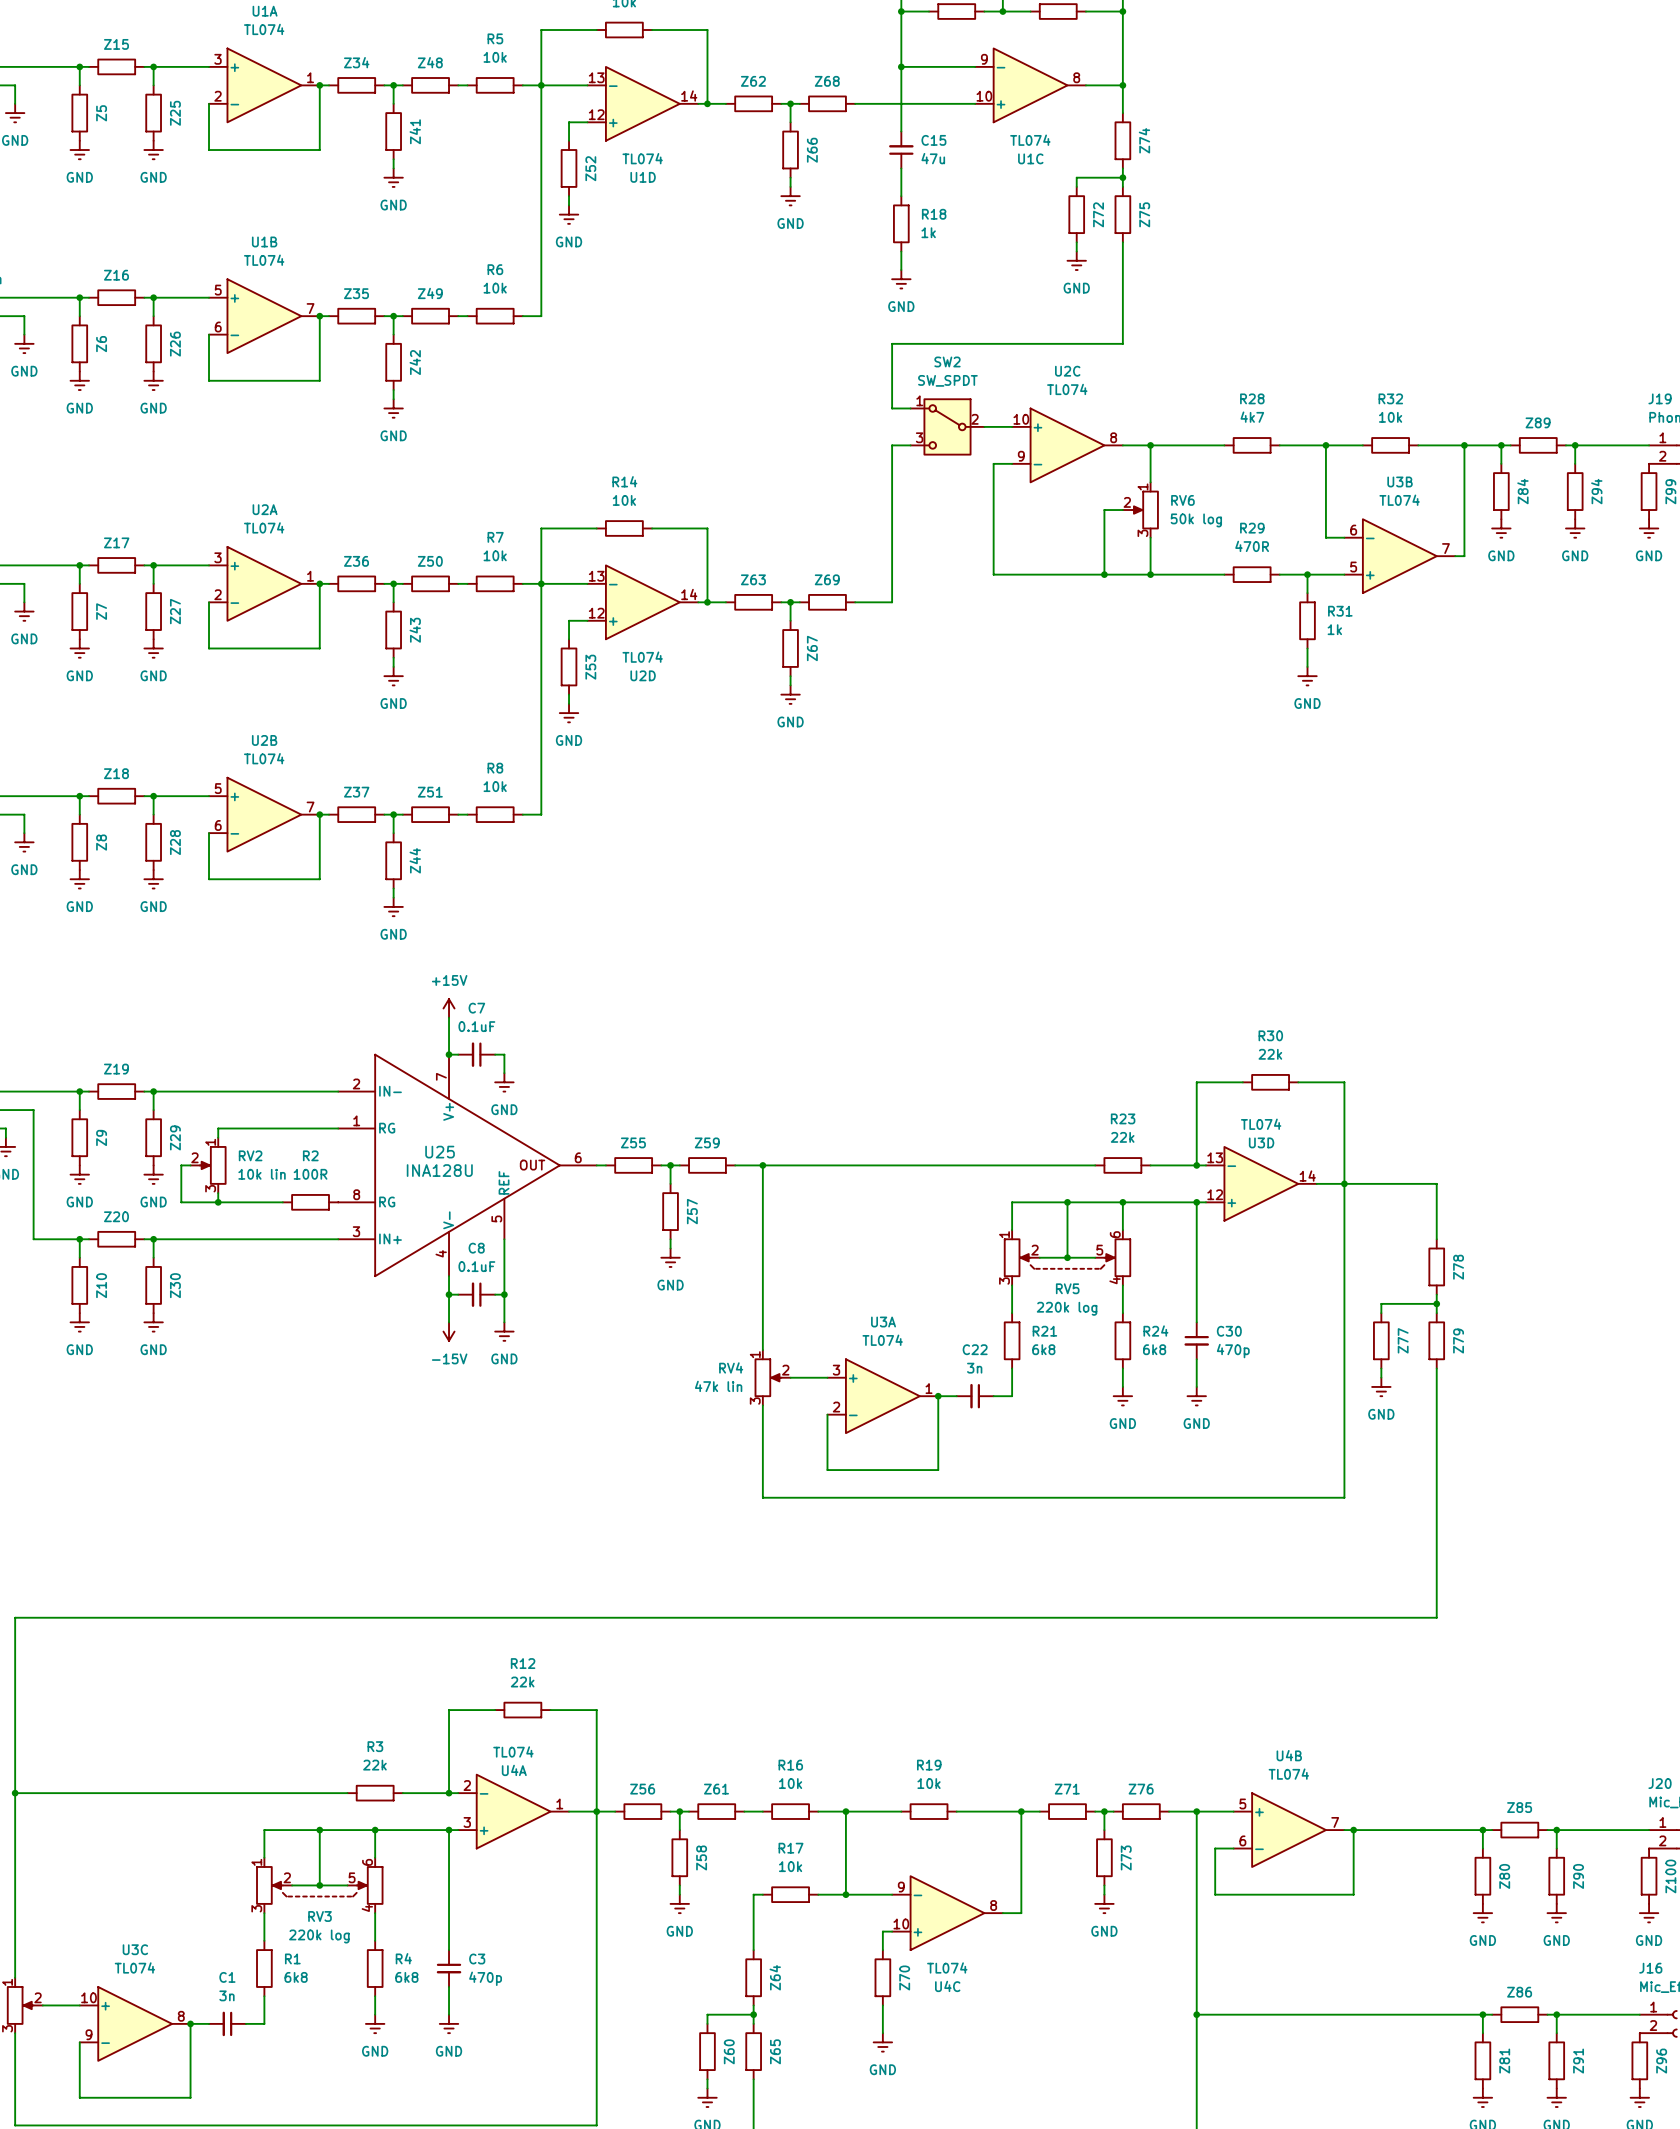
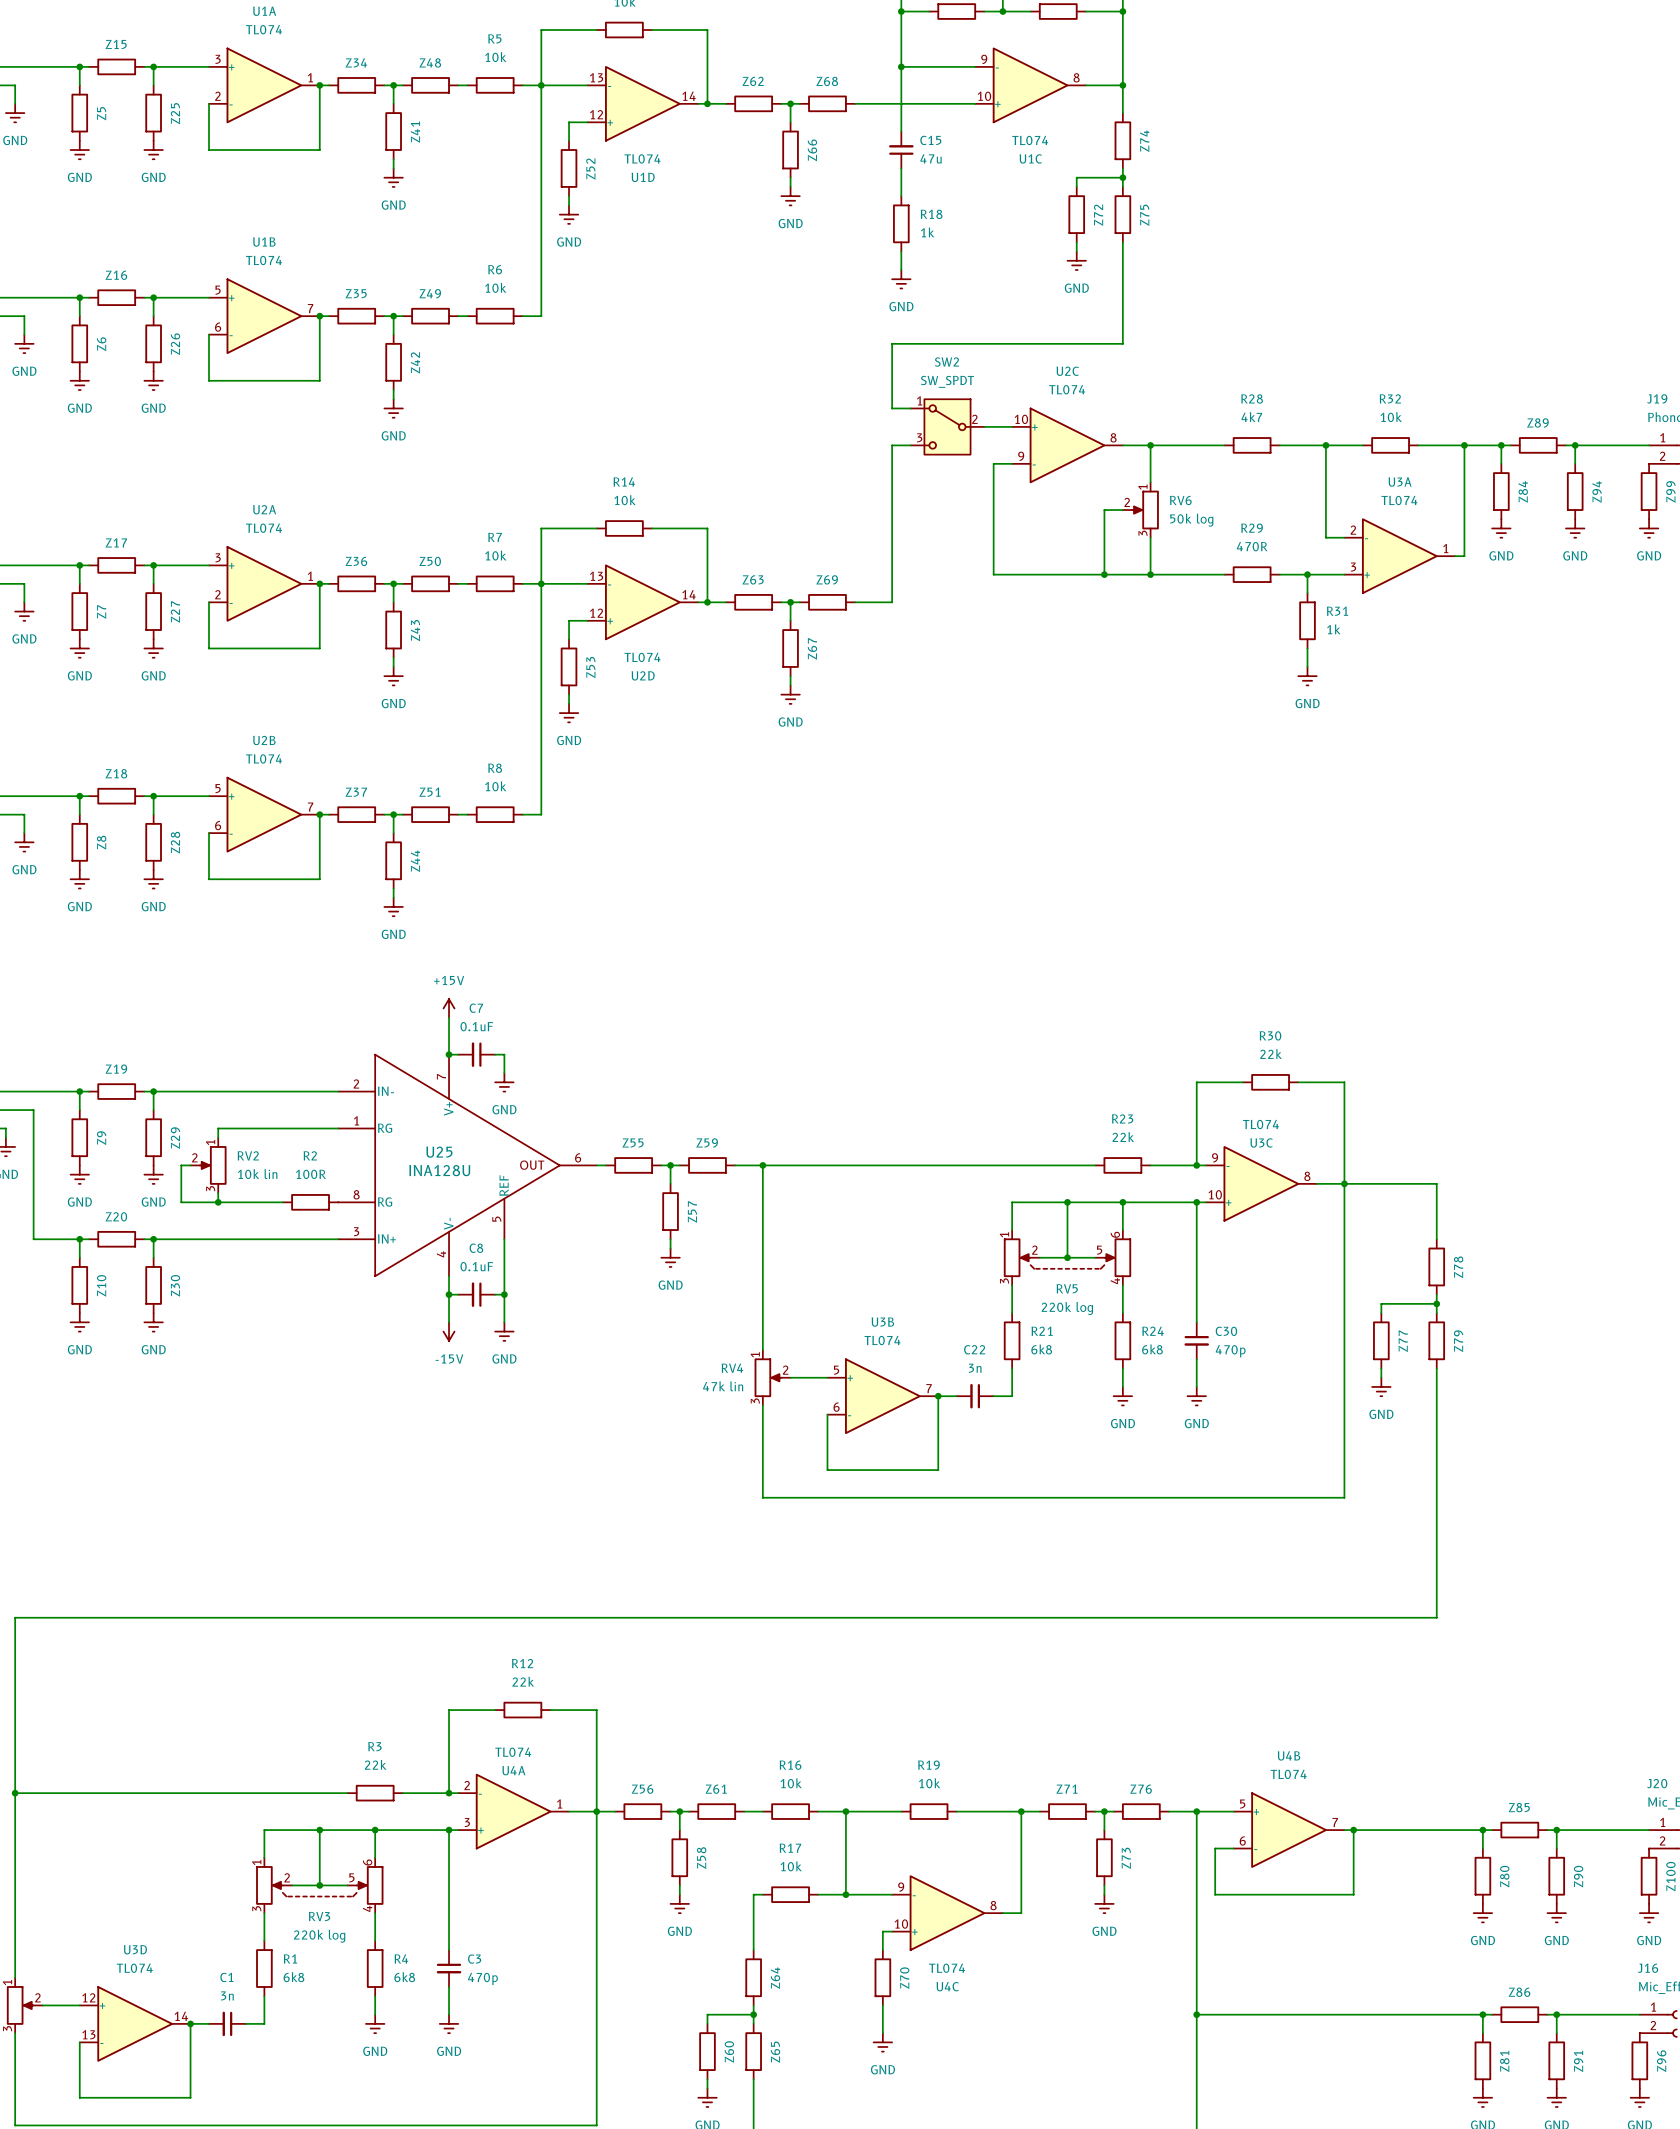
U3B flip: as is (1399, 556) -> up-down (882, 1396)
U3B position: (1399, 556) -> (882, 1396)
U3D name position: U3D (1261, 1142) -> U3D (135, 1949)
U3D flip: as is (1261, 1183) -> up-down (135, 2023)
U3D position: (1261, 1183) -> (135, 2023)
U3A flip: as is (882, 1396) -> up-down (1399, 556)
U3A position: (882, 1396) -> (1399, 556)
U3C name position: U3C (135, 1949) -> U3C (1261, 1142)
U3C flip: as is (135, 2023) -> up-down (1261, 1183)
U3C position: (135, 2023) -> (1261, 1183)

